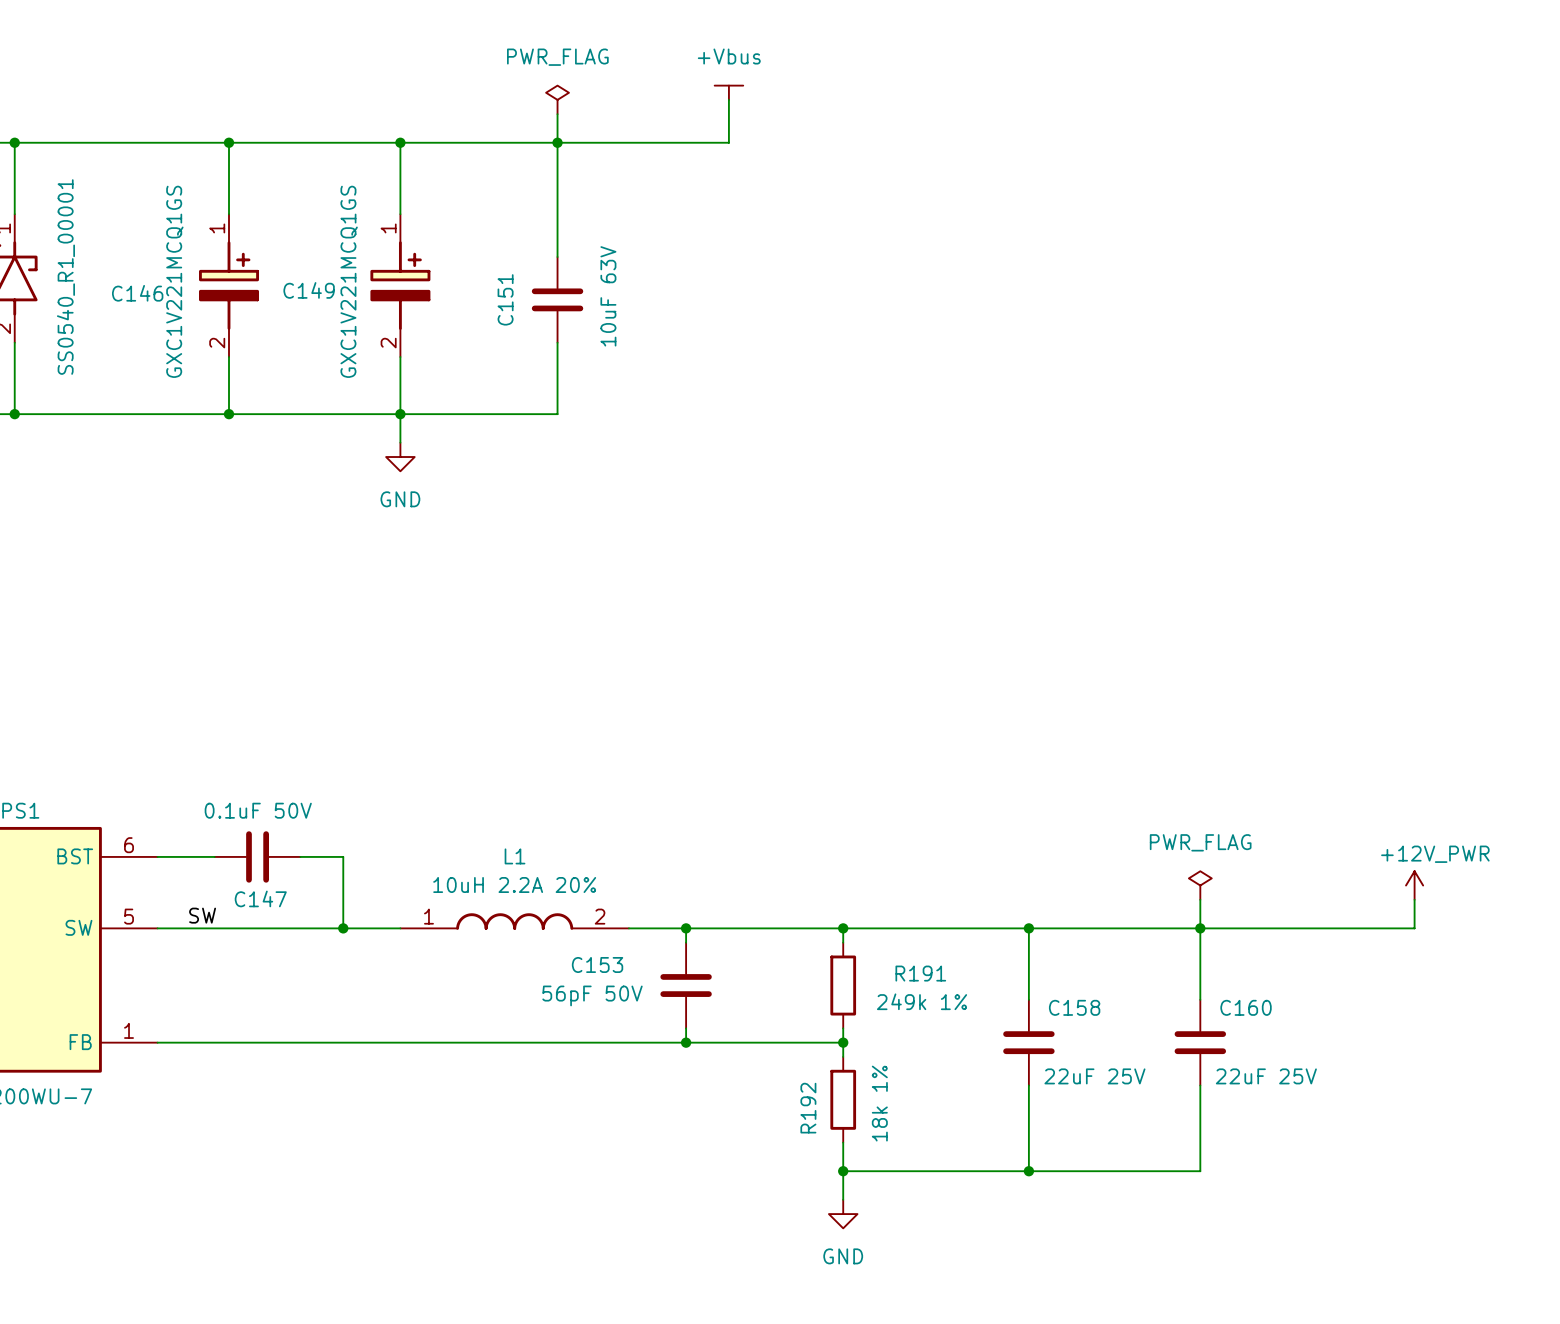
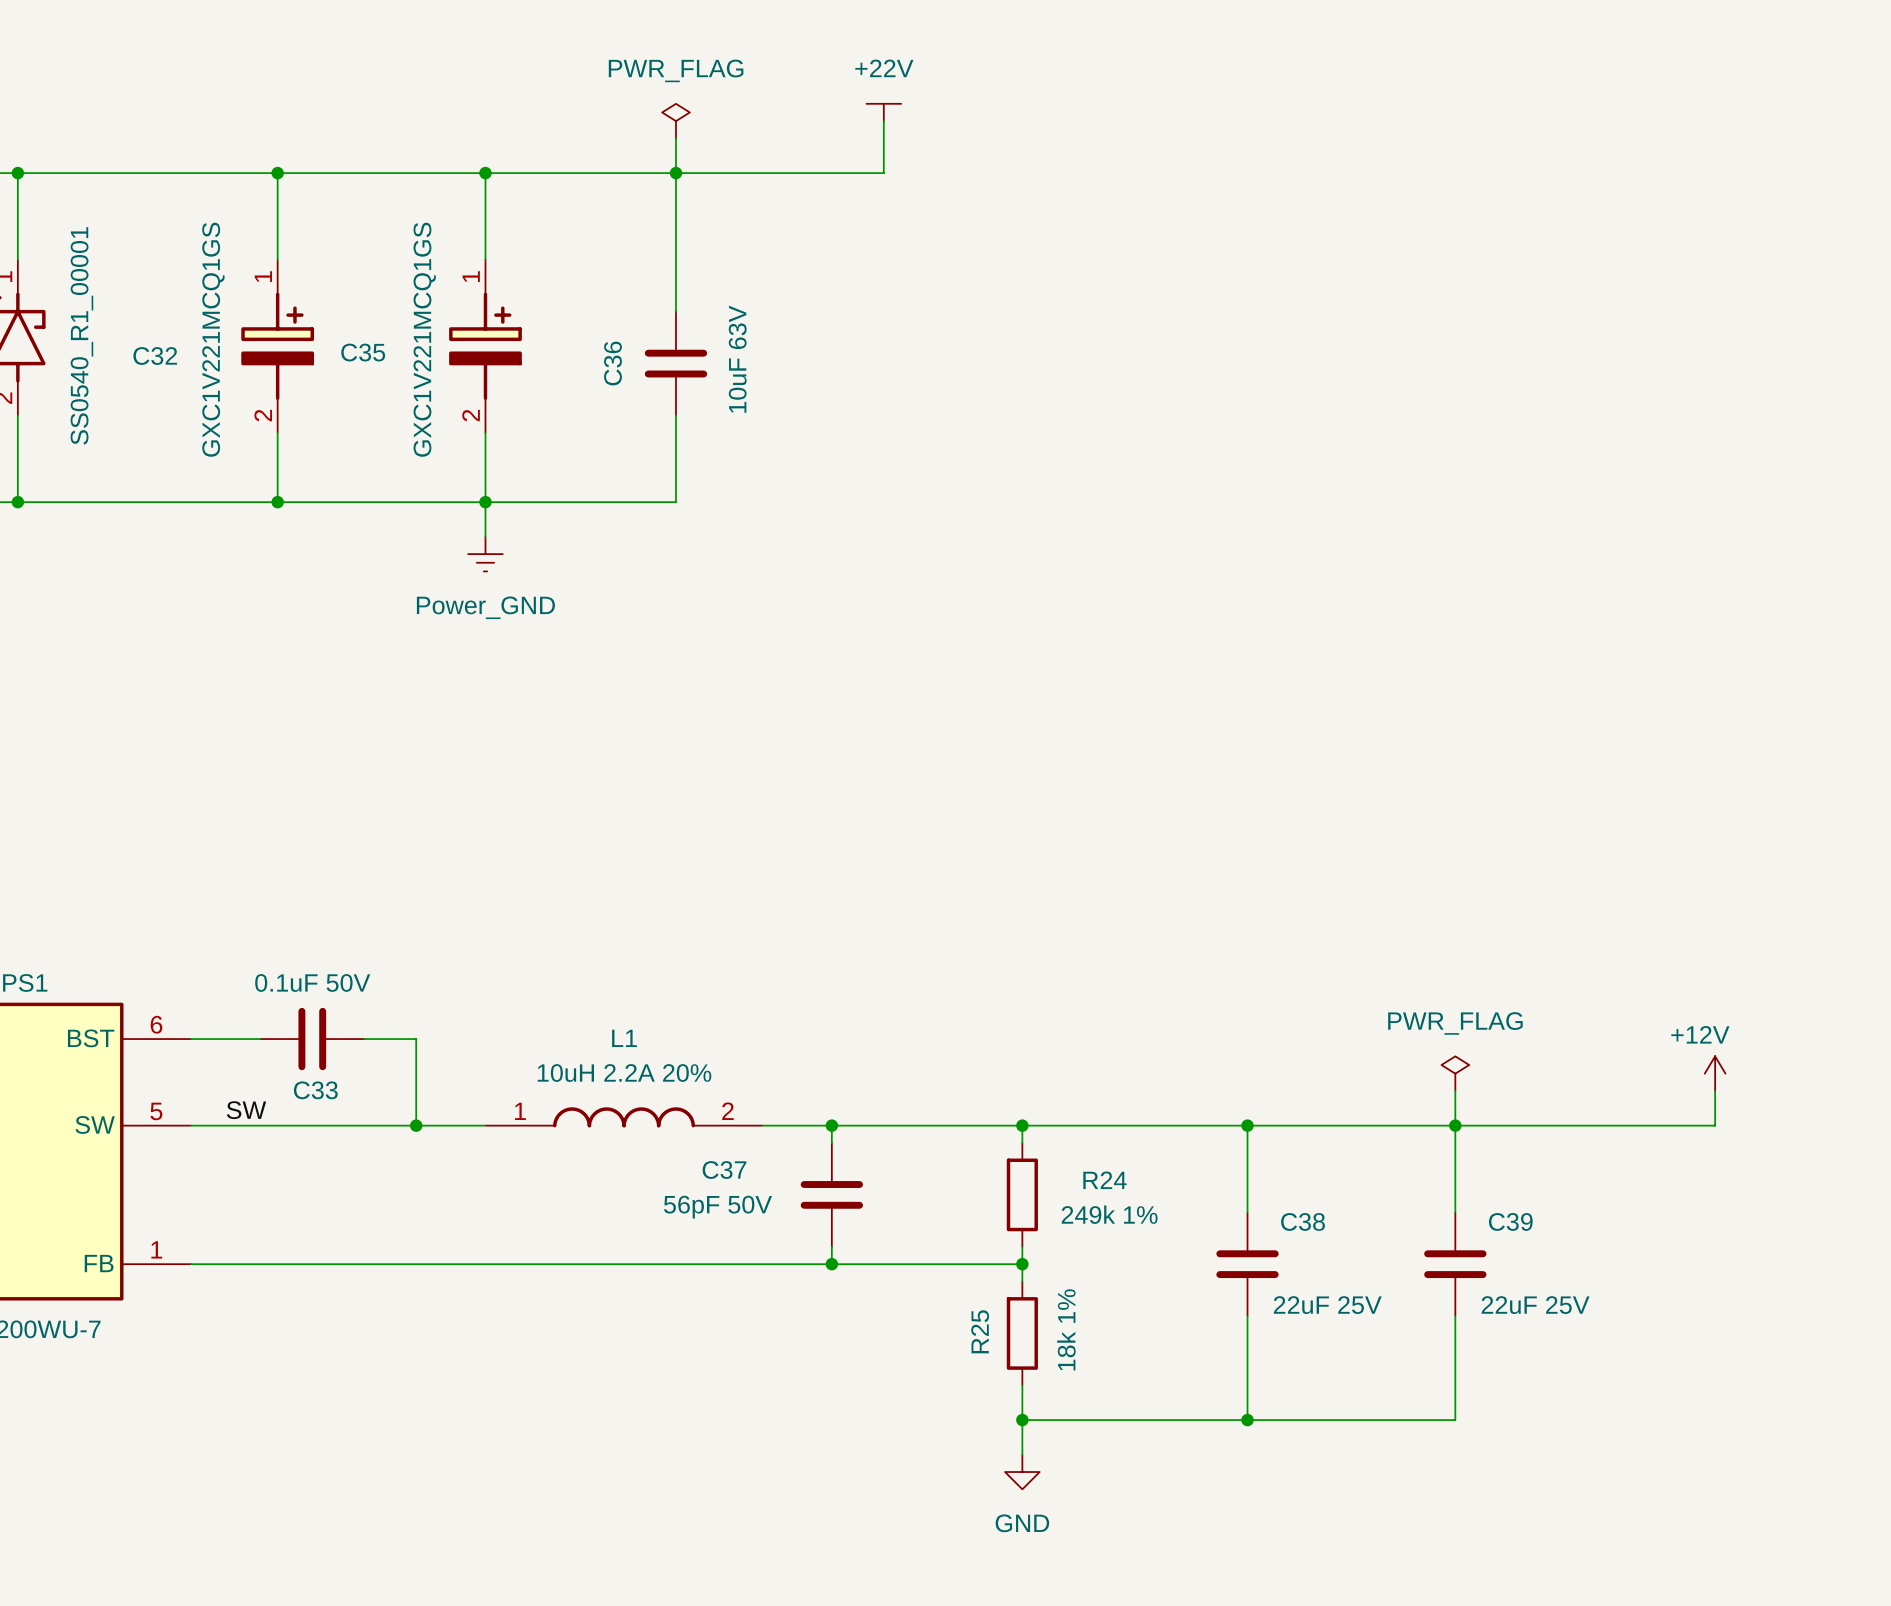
power symbol: +Vbus (728, 92) -> +22V (883, 112)
C149 name: C149 (309, 290) -> C35 (363, 352)
C146 name: C146 (137, 293) -> C32 (155, 356)
C151 name: C151 (505, 299) -> C36 (612, 363)
power symbol: GND (400, 457) -> Power_GND (485, 554)
power symbol: +12V_PWR (1414, 885) -> +12V (1715, 1073)
C147 name: C147 (260, 898) -> C33 (315, 1090)
C153 name: C153 (597, 964) -> C37 (724, 1170)
R191 name: R191 (920, 973) -> R24 (1105, 1180)
C158 name: C158 (1074, 1007) -> C38 (1303, 1221)
C160 name: C160 (1246, 1007) -> C39 (1510, 1221)
R192 name: R192 (808, 1108) -> R25 (980, 1331)

